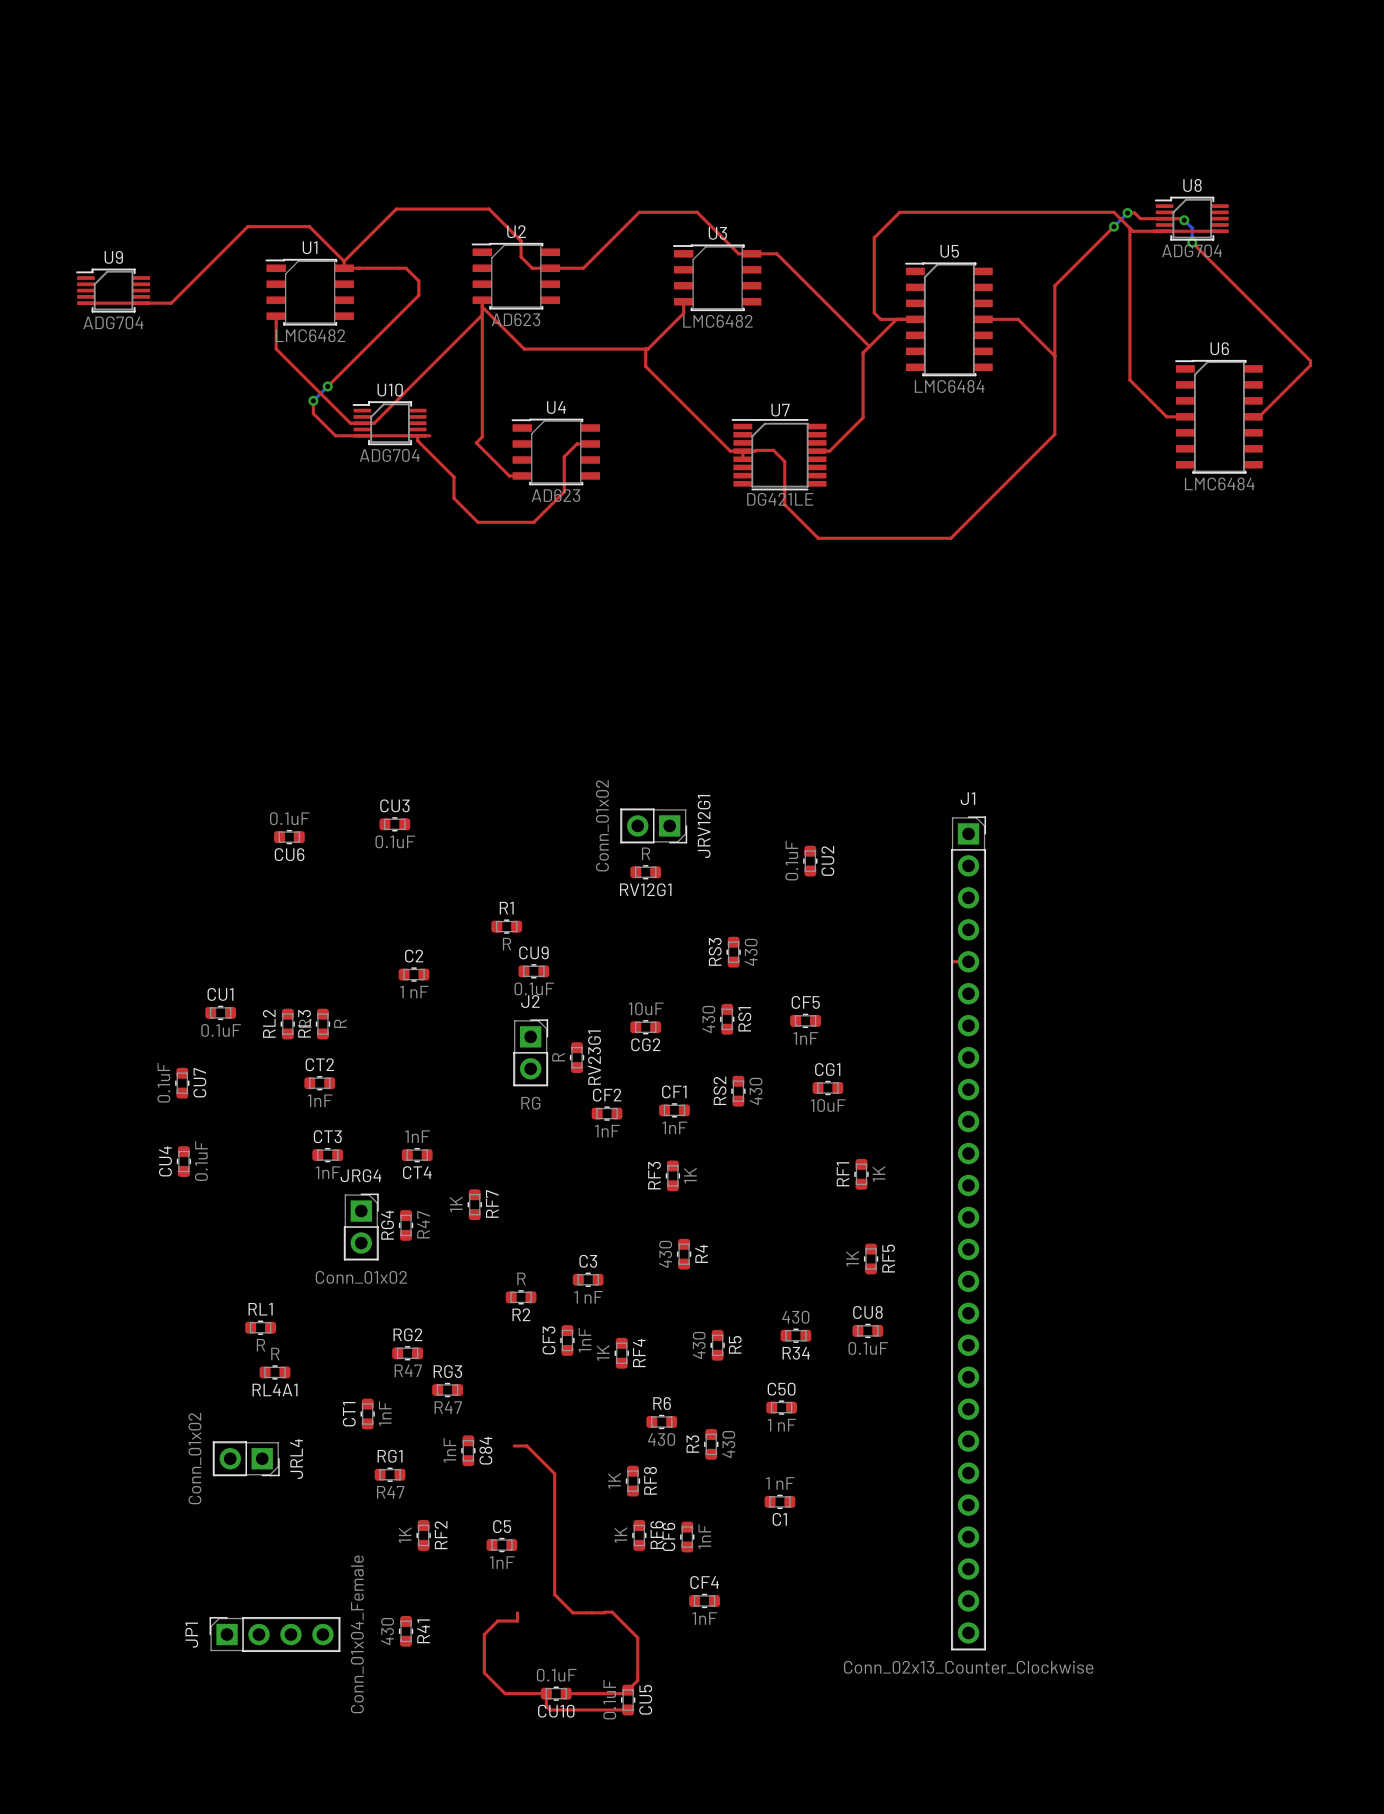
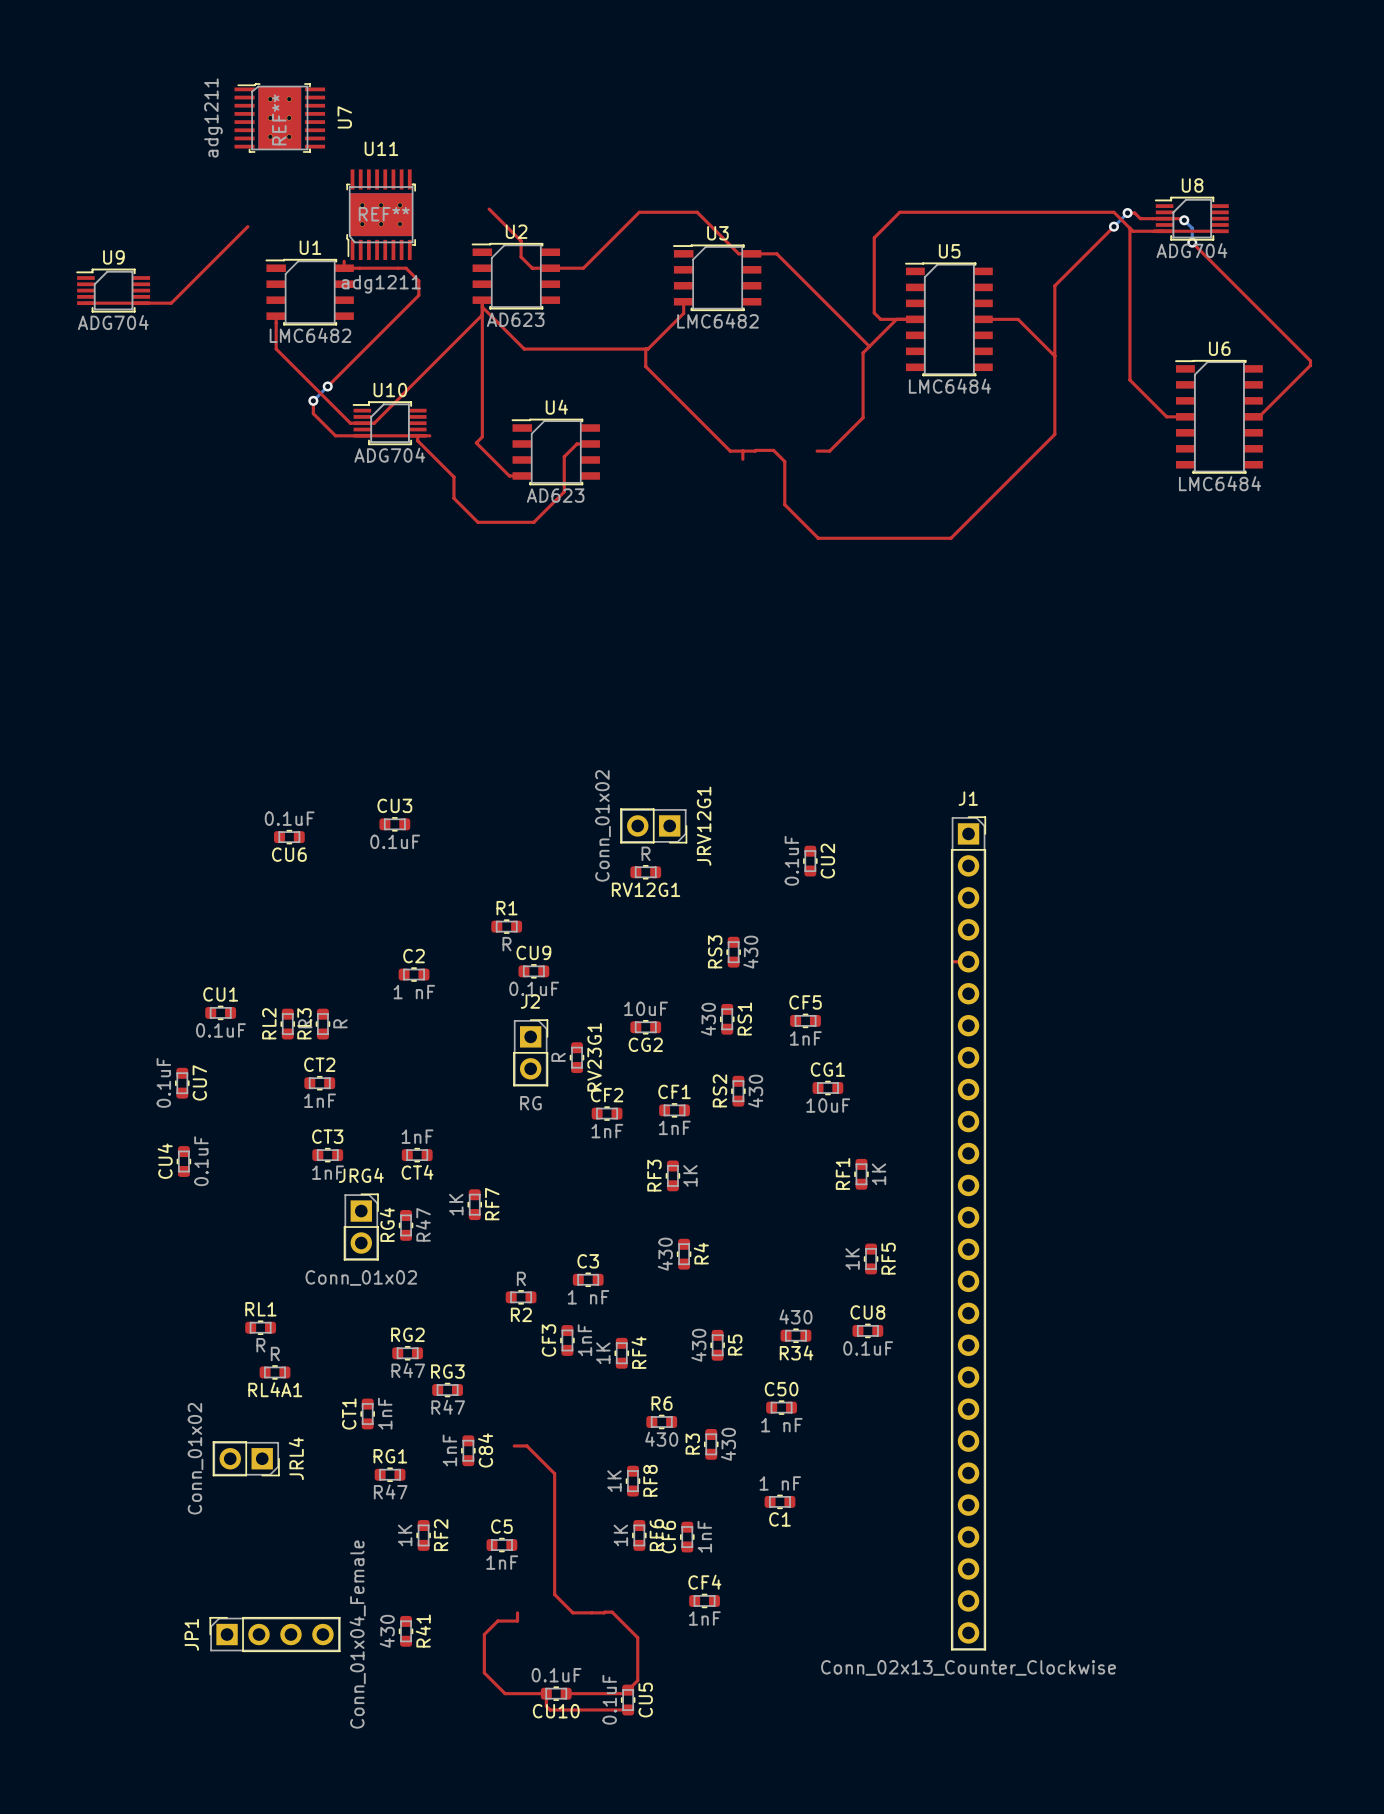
top track: (489, 209) (396, 209) (344, 261) (309, 226) (247, 226) -> none
U11: none -> adg1211 (381, 214)
U7 name position: U7 (780, 410) -> U7 (344, 117)
U7 footprint: [731, 419, 827, 491] -> [234, 83, 326, 153]
U7 value: DG421LE (780, 499) -> adg1211 (213, 118)

